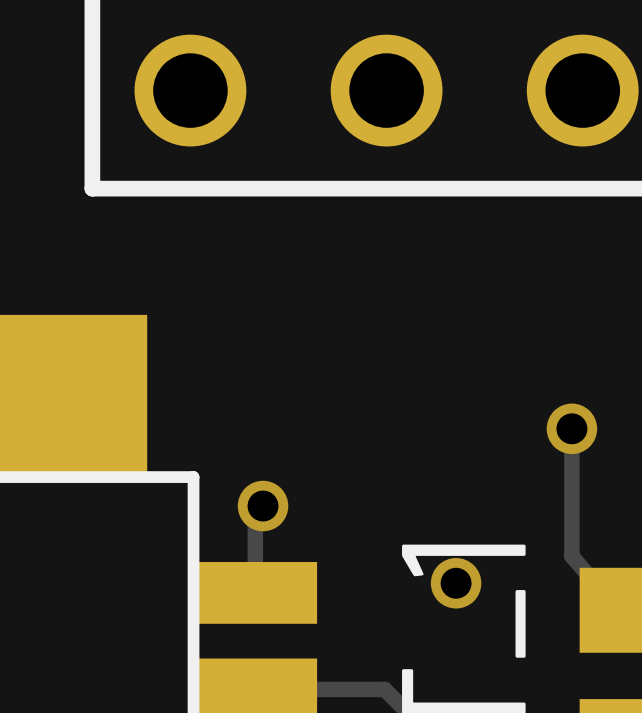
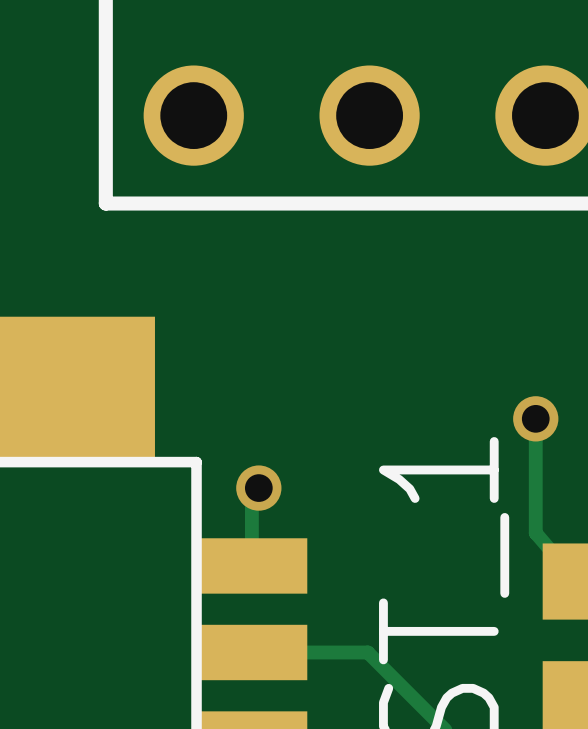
via: (456, 583) -> none

